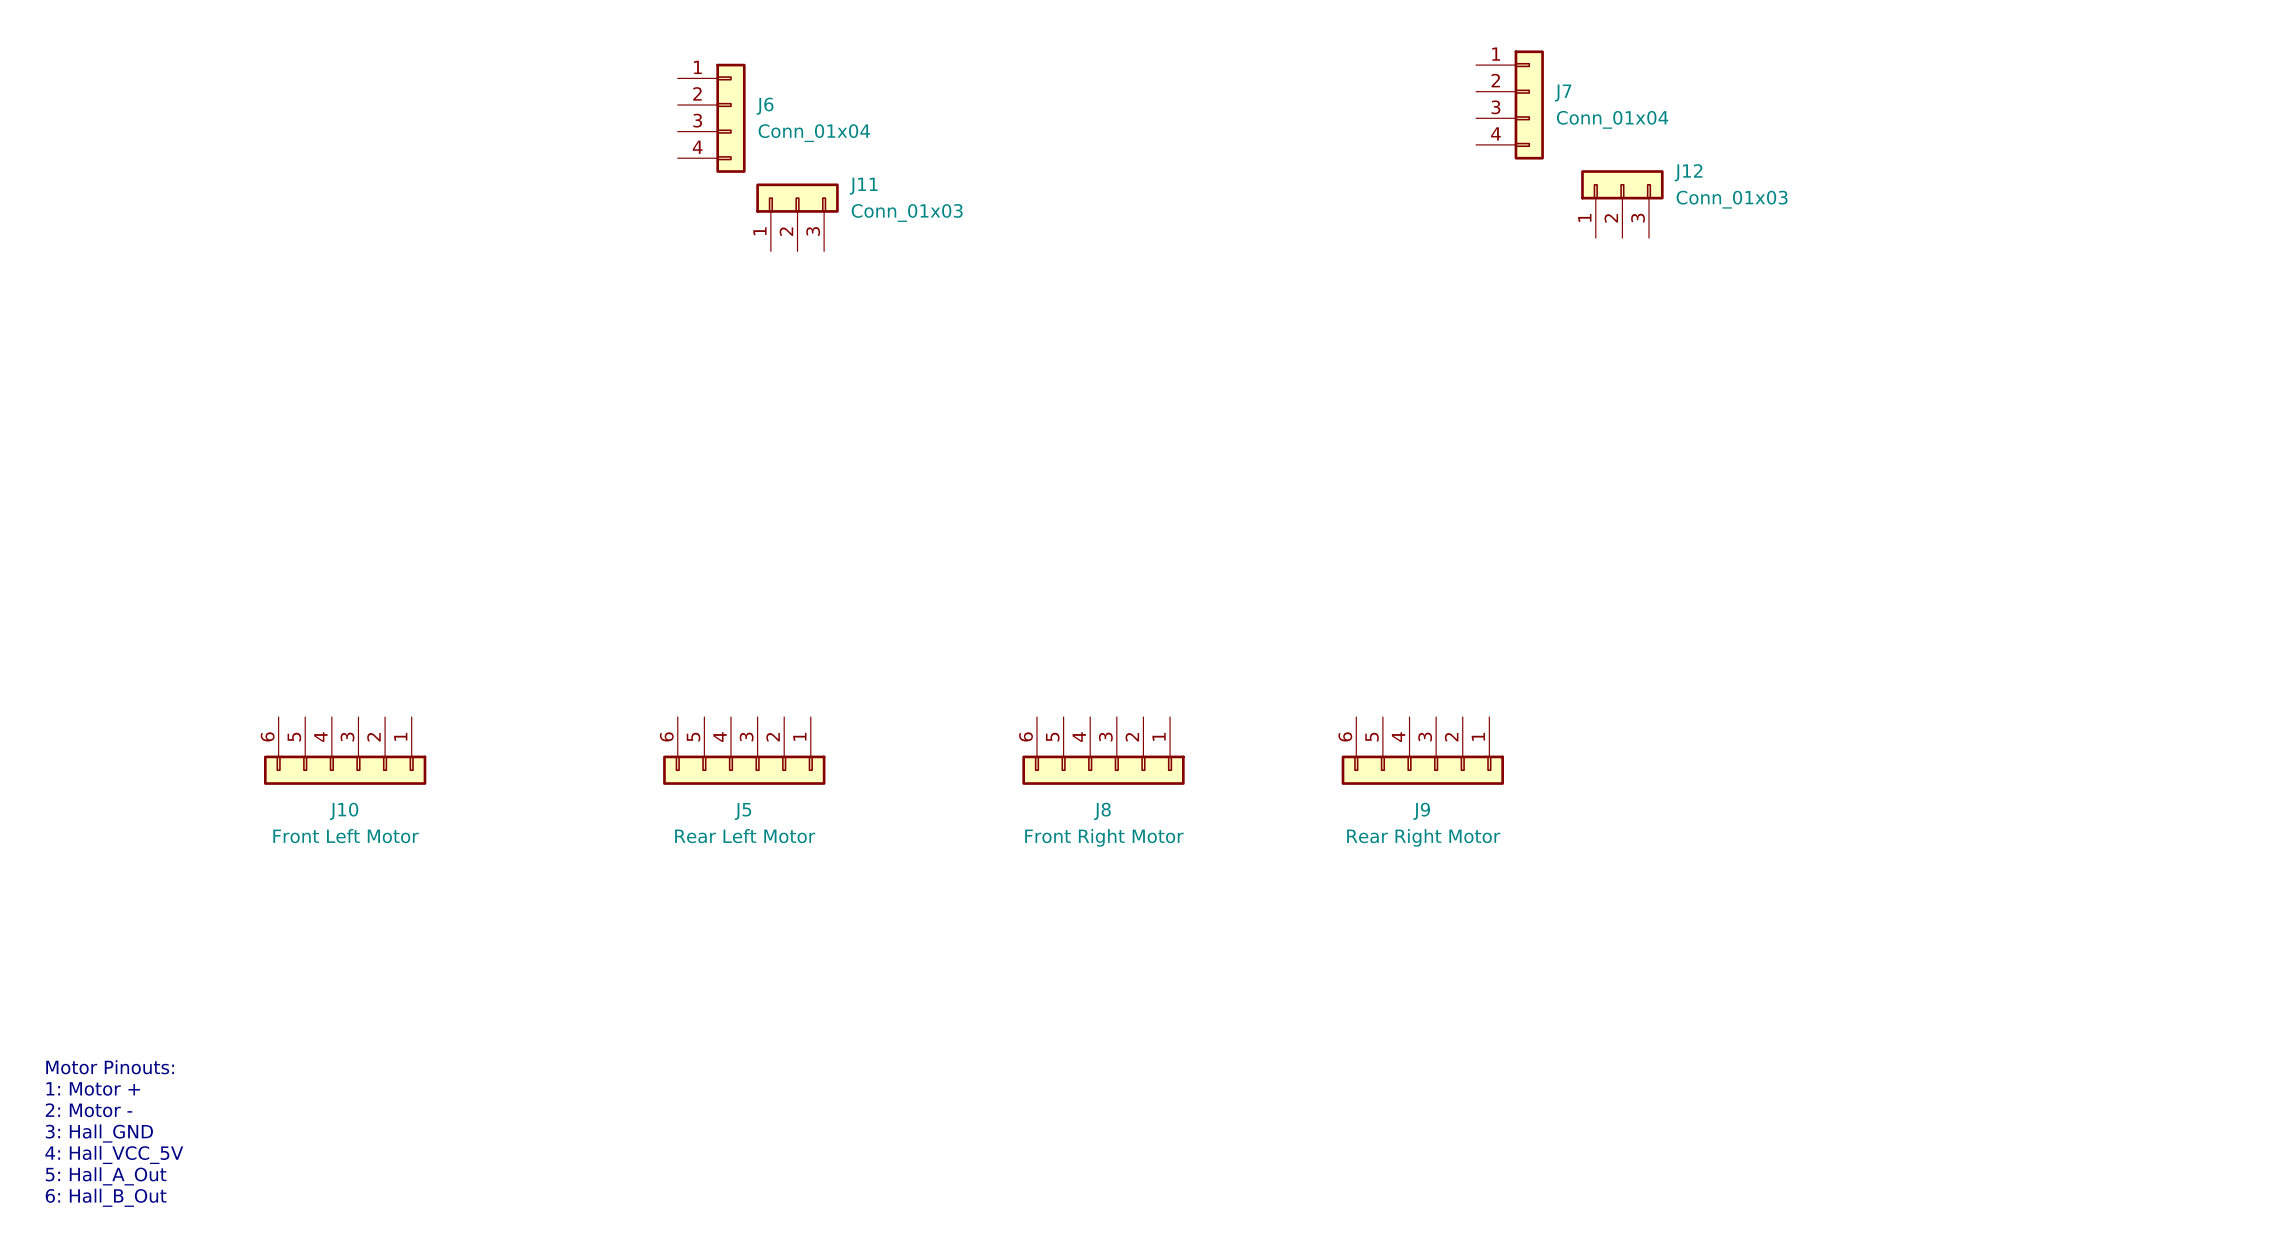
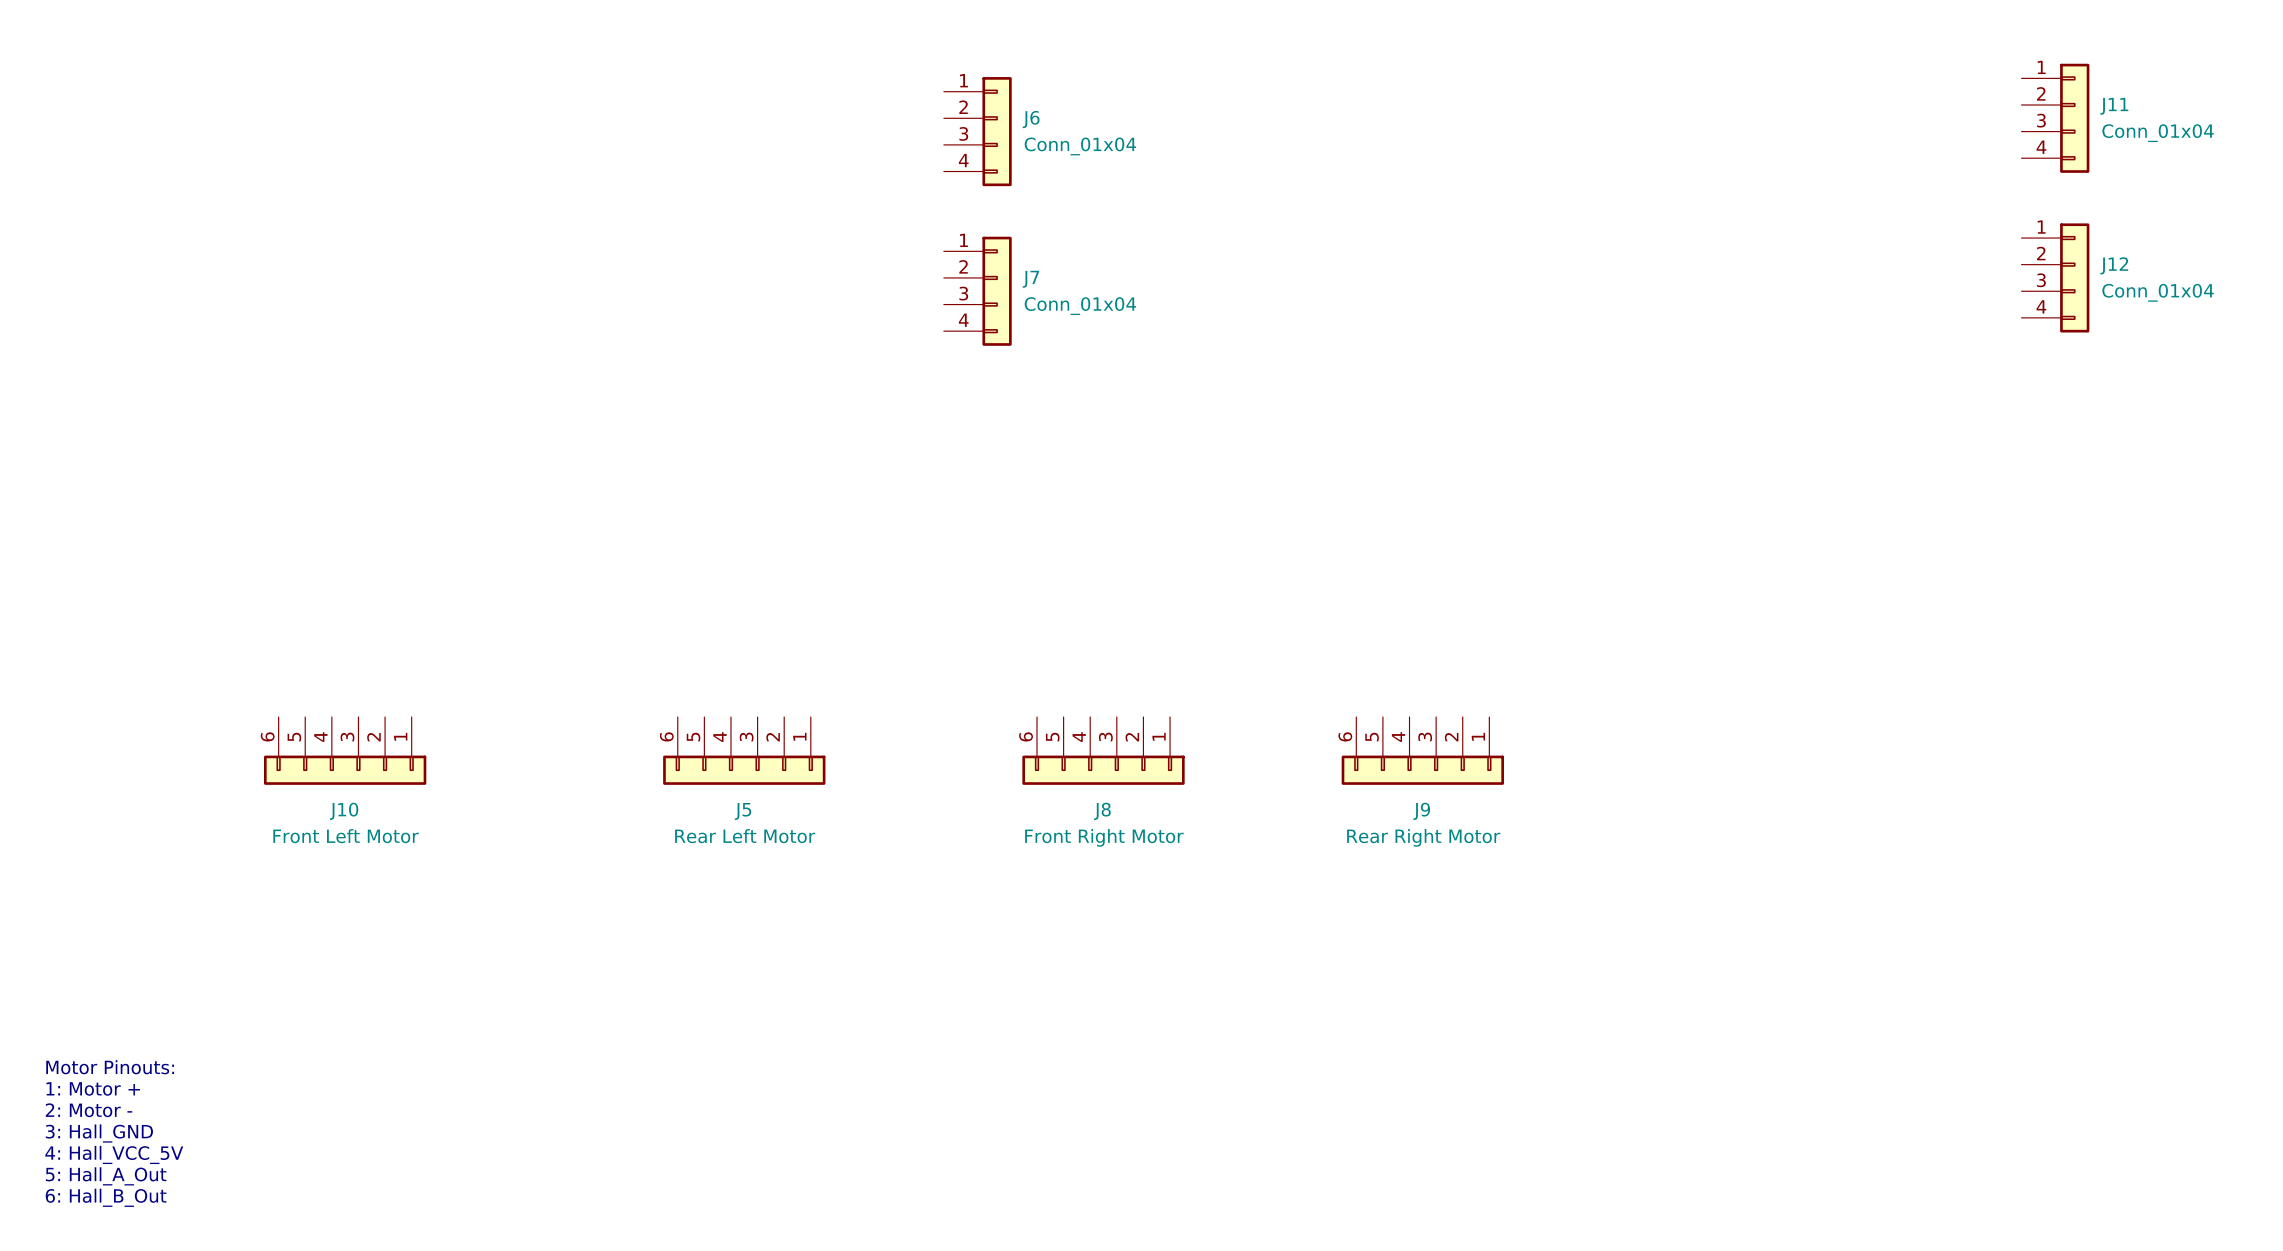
J7 position: (1509, 104) -> (977, 291)
J6 position: (711, 118) -> (977, 131)
J12 symbol: [1581, 170, 1664, 239] -> [2021, 223, 2090, 333]
J11 symbol: [756, 183, 839, 252] -> [2021, 63, 2090, 173]
J12 value: Conn_01x03 (1732, 199) -> Conn_01x04 (2158, 292)
J11 value: Conn_01x03 (907, 212) -> Conn_01x04 (2158, 133)

